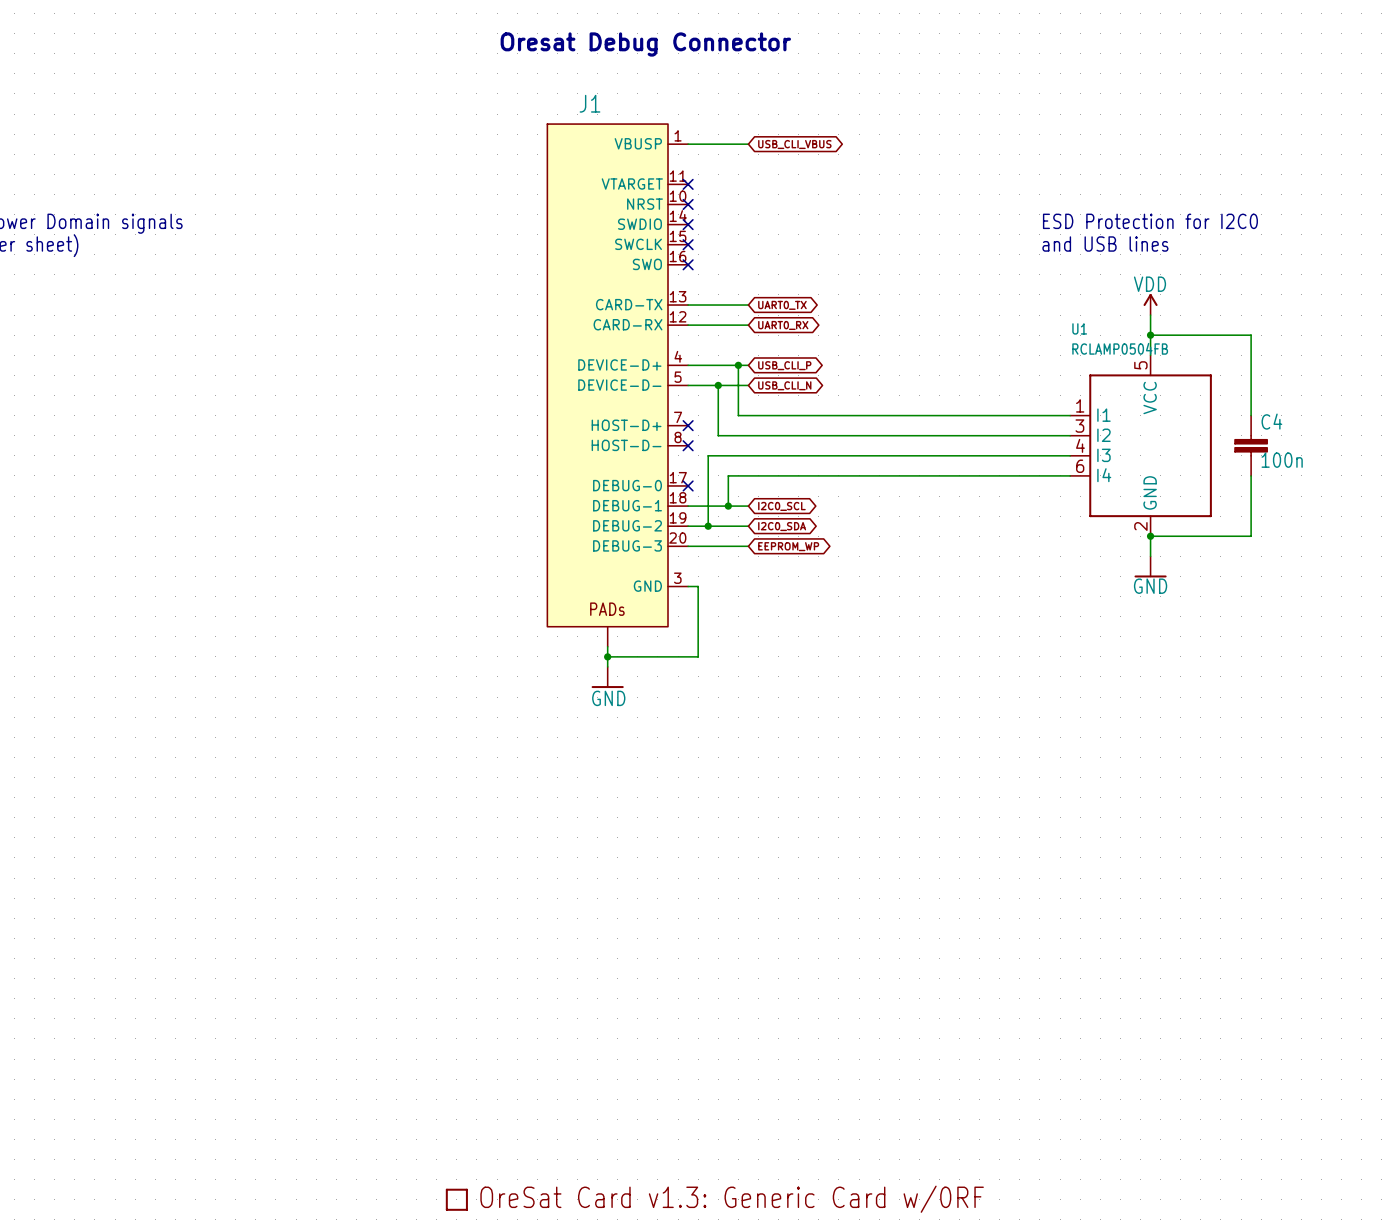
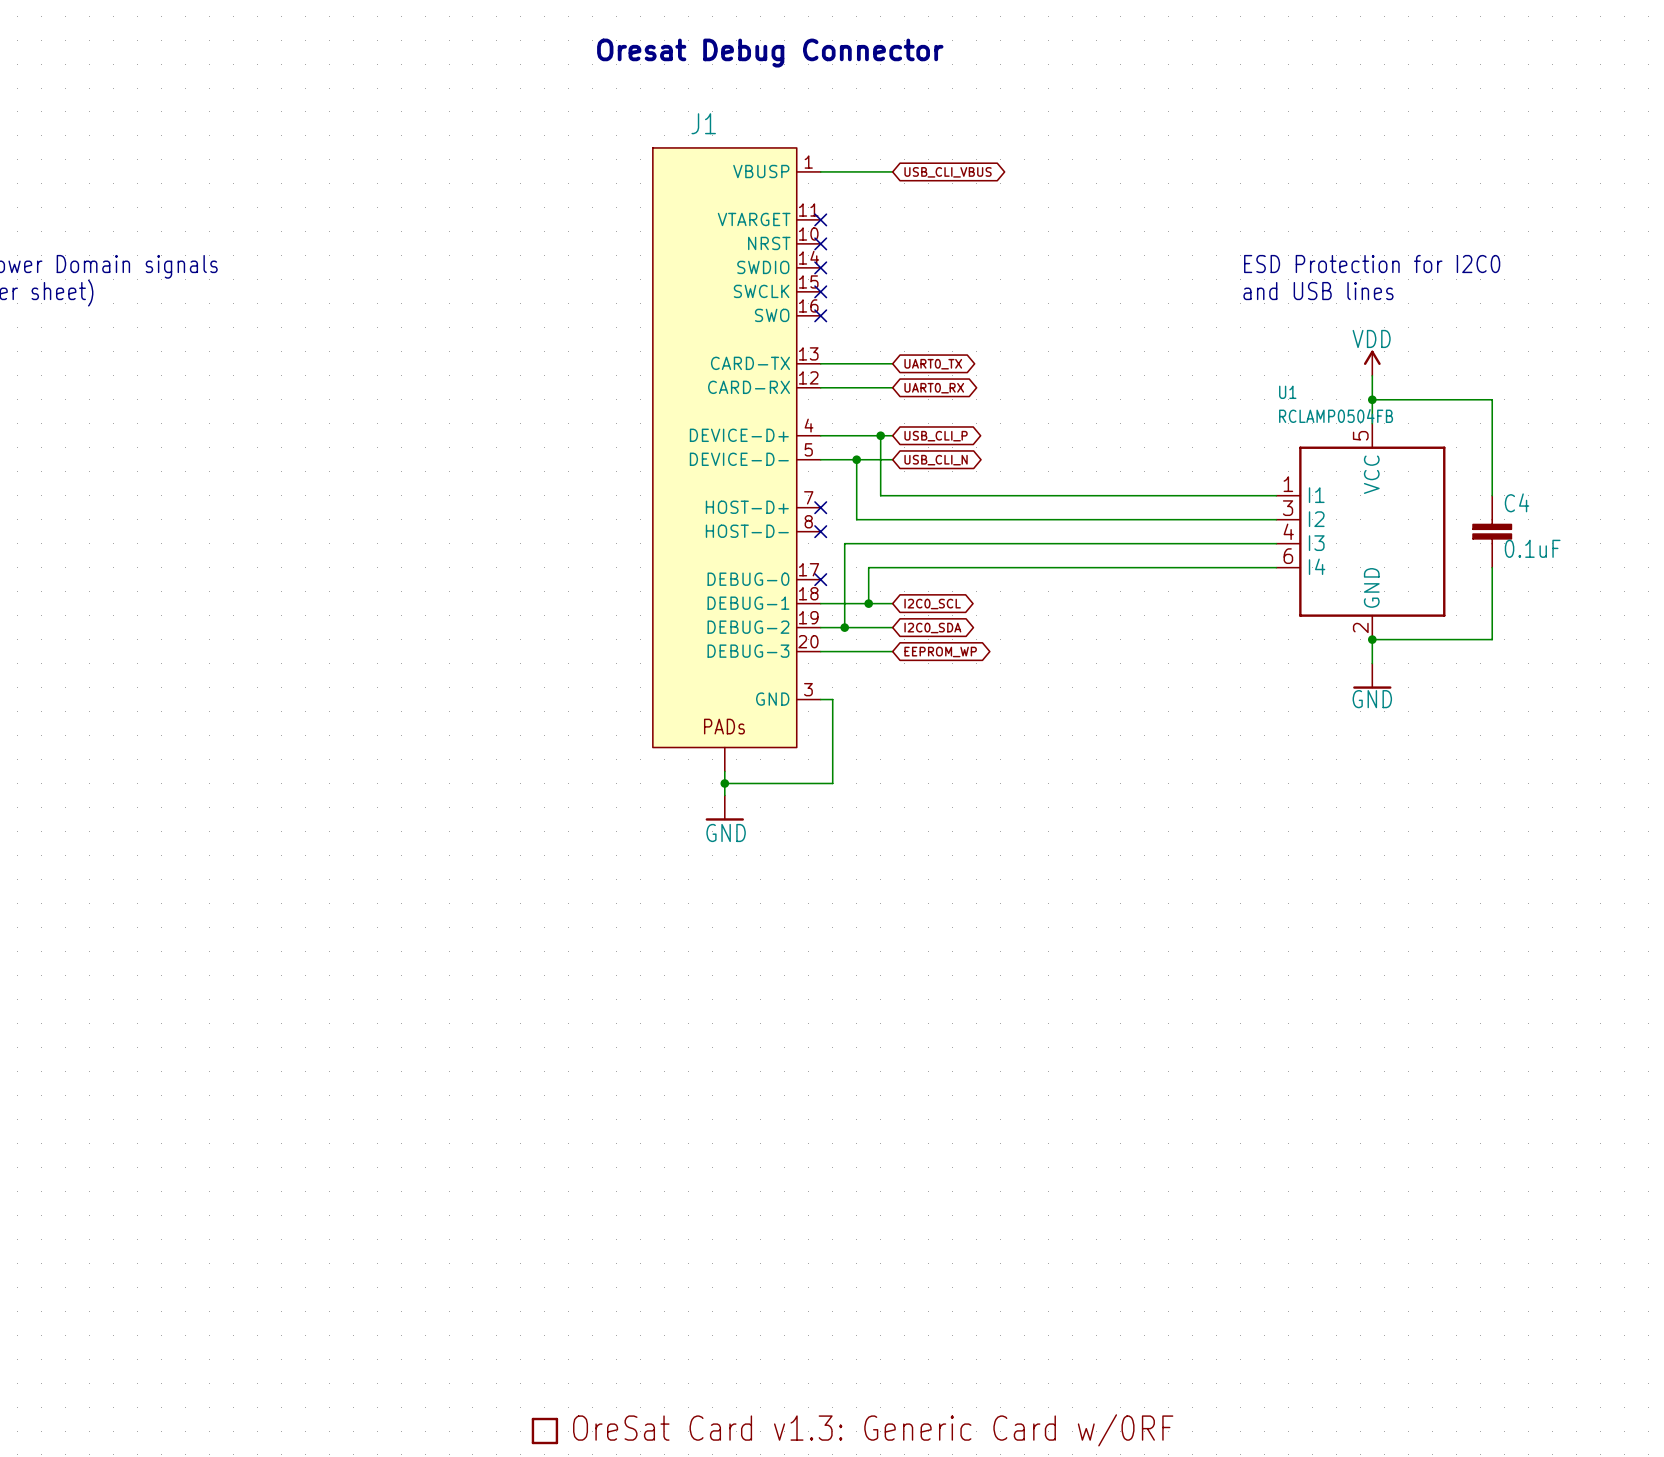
C4 value: 100n (1282, 460) -> 0.1uF (1532, 548)

